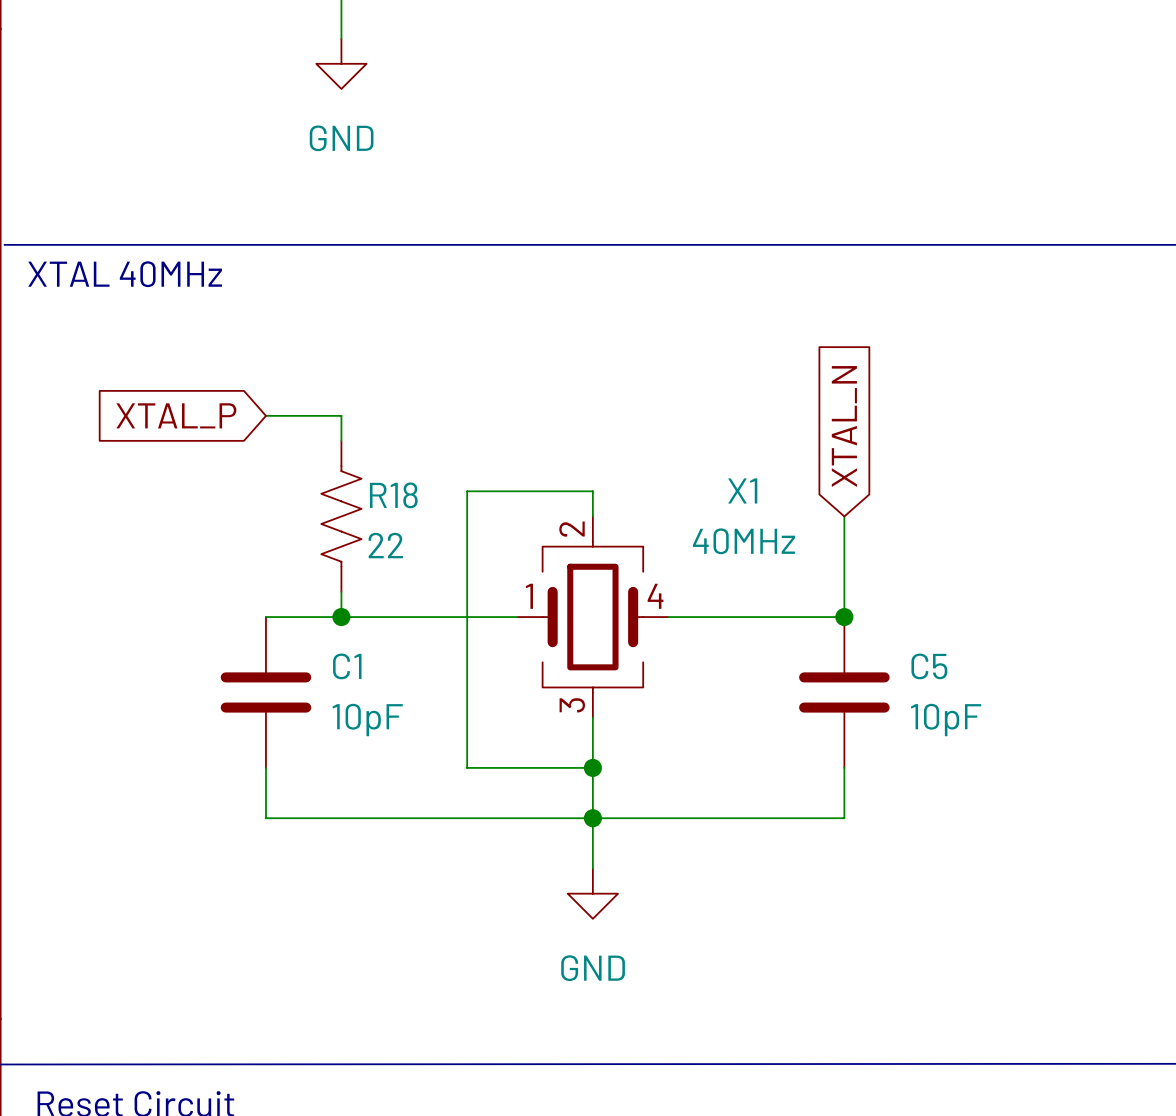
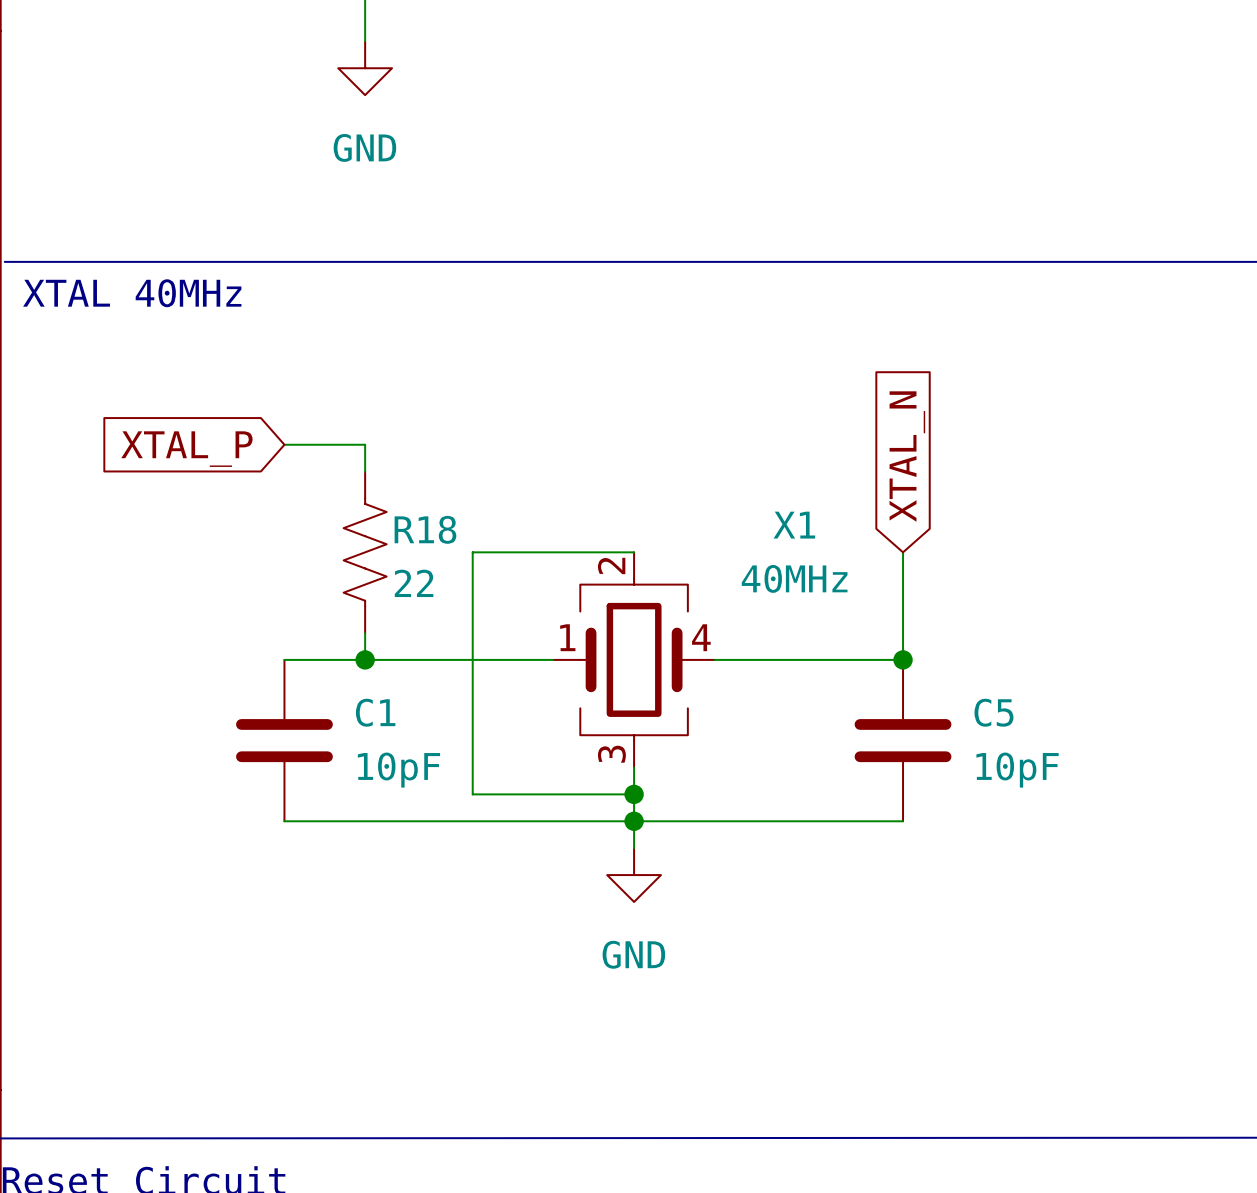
wire: (592, 516) (592, 491) (467, 491) (467, 767) -> (634, 552) (472, 552) (472, 794) (634, 794)
wire: (265, 767) (265, 818) (844, 818) (844, 767) -> (634, 821) (903, 821)
wire: none -> (284, 821) (499, 821)
wire: (592, 793) (592, 868) -> none
junction position: (592, 818) -> (634, 794)
power symbol position: GND (592, 893) -> GND (634, 875)

